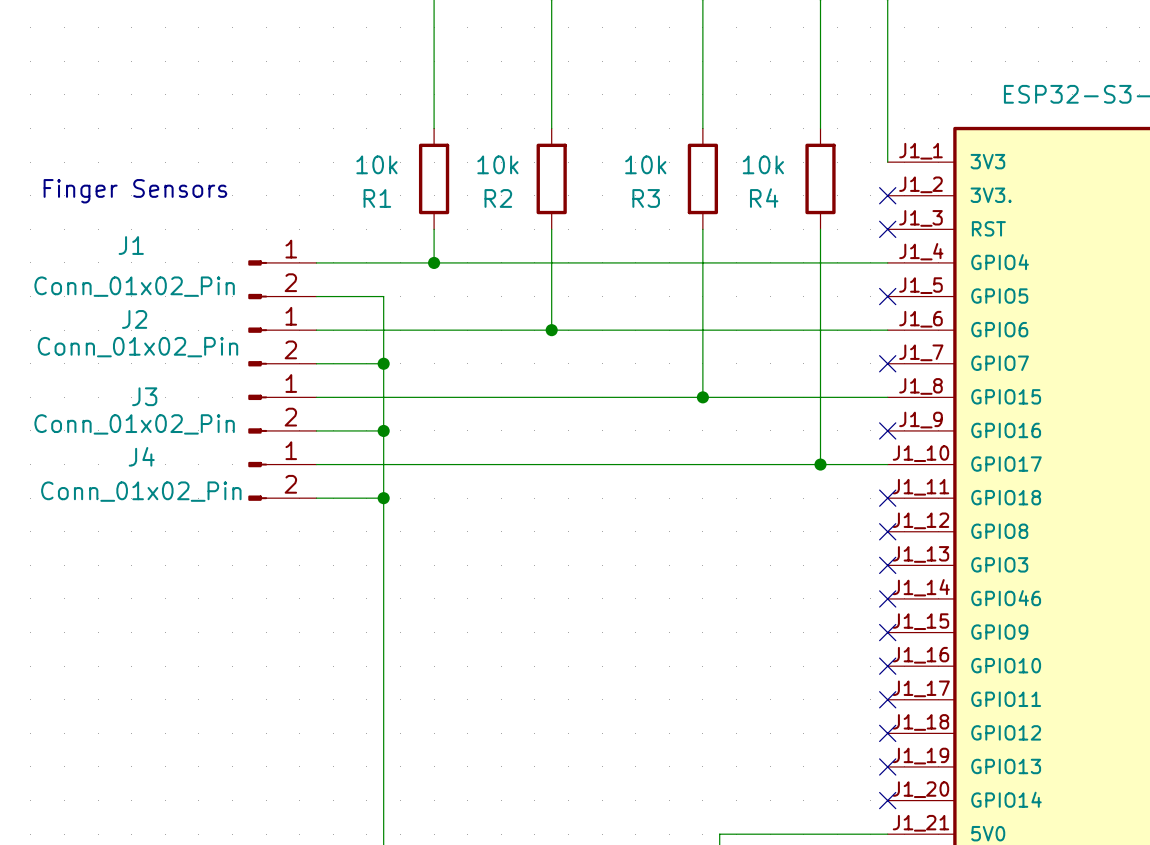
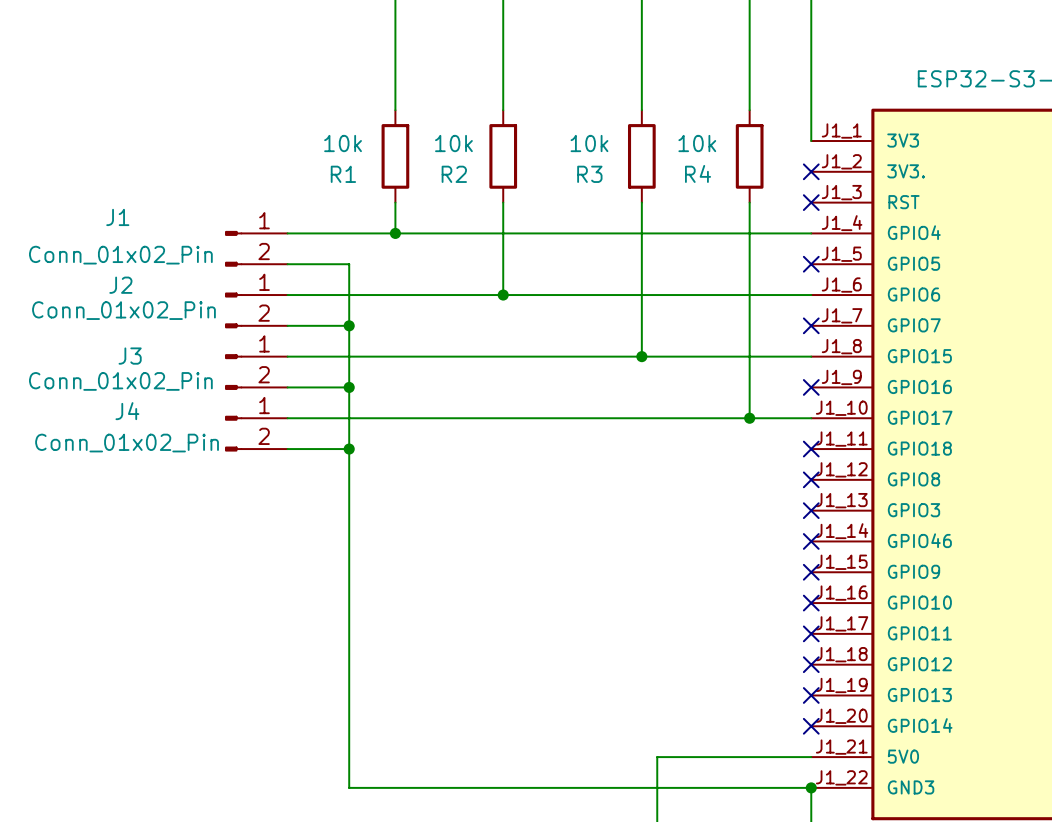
text: Finger Sensors (135, 191) -> none

